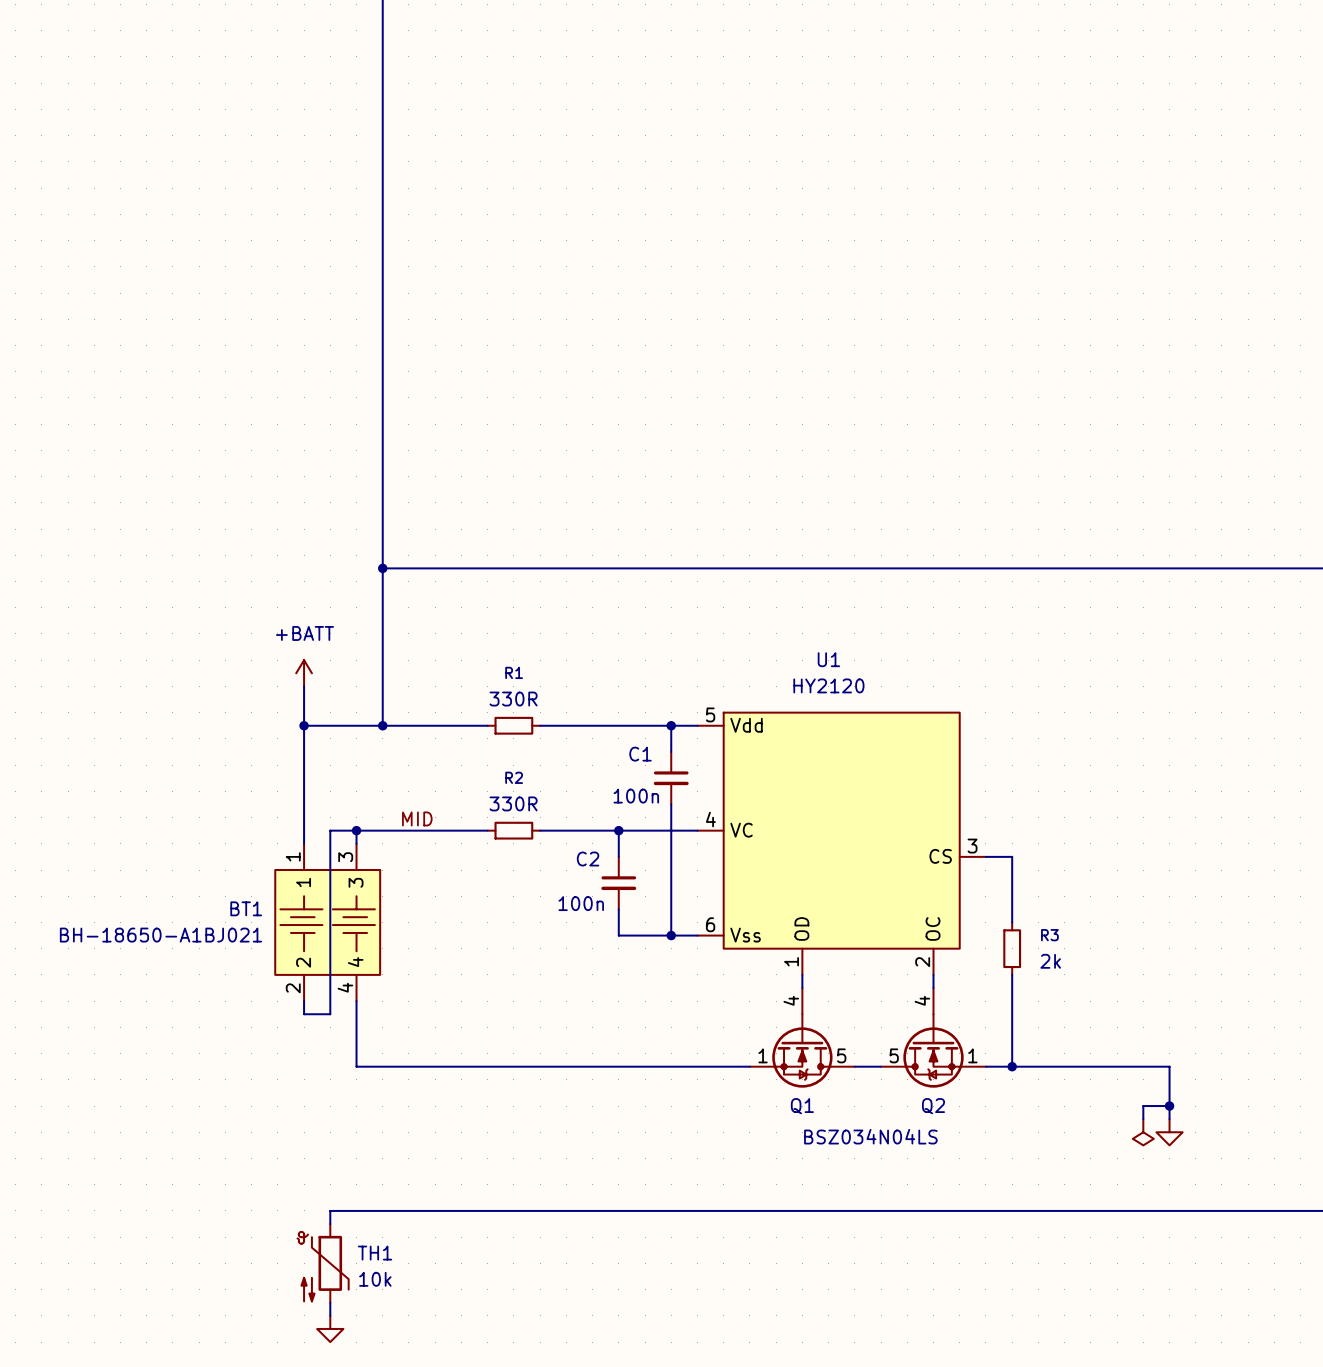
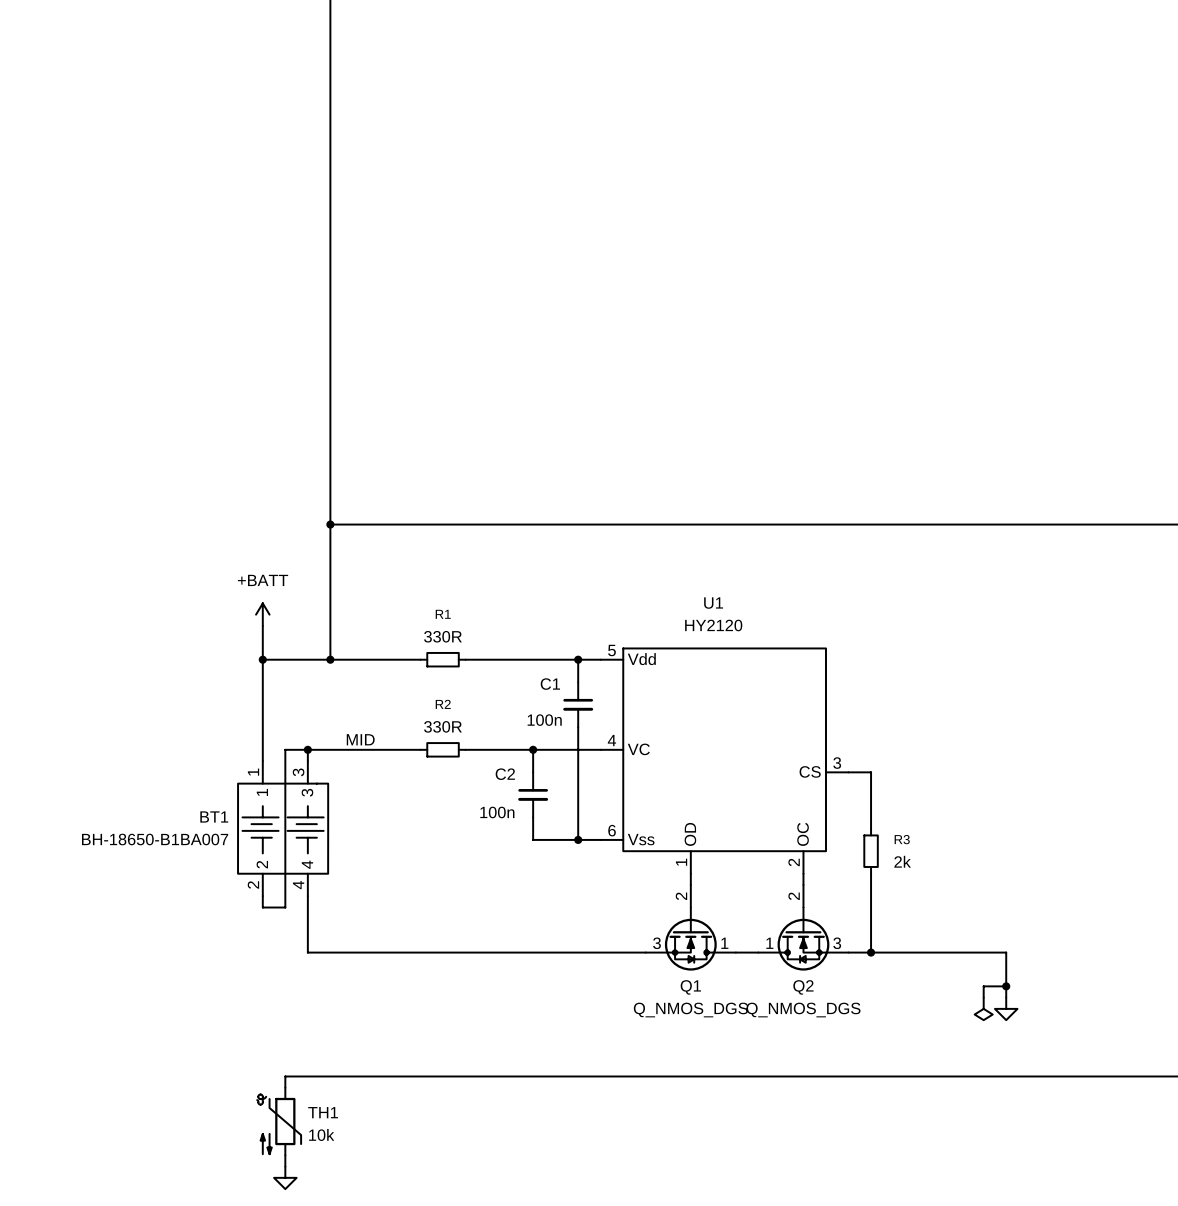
BT1 value: BH-18650-A1BJ021 (160, 935) -> BH-18650-B1BA007 (155, 839)
Q1 symbol: [749, 988, 855, 1088] -> [645, 884, 736, 971]
Q2 symbol: [881, 988, 986, 1088] -> [758, 884, 849, 971]
Q2 value: none -> Q_NMOS_DGS (803, 1010)
Q1 value: BSZ034N04LS (870, 1136) -> Q_NMOS_DGS (690, 1010)

